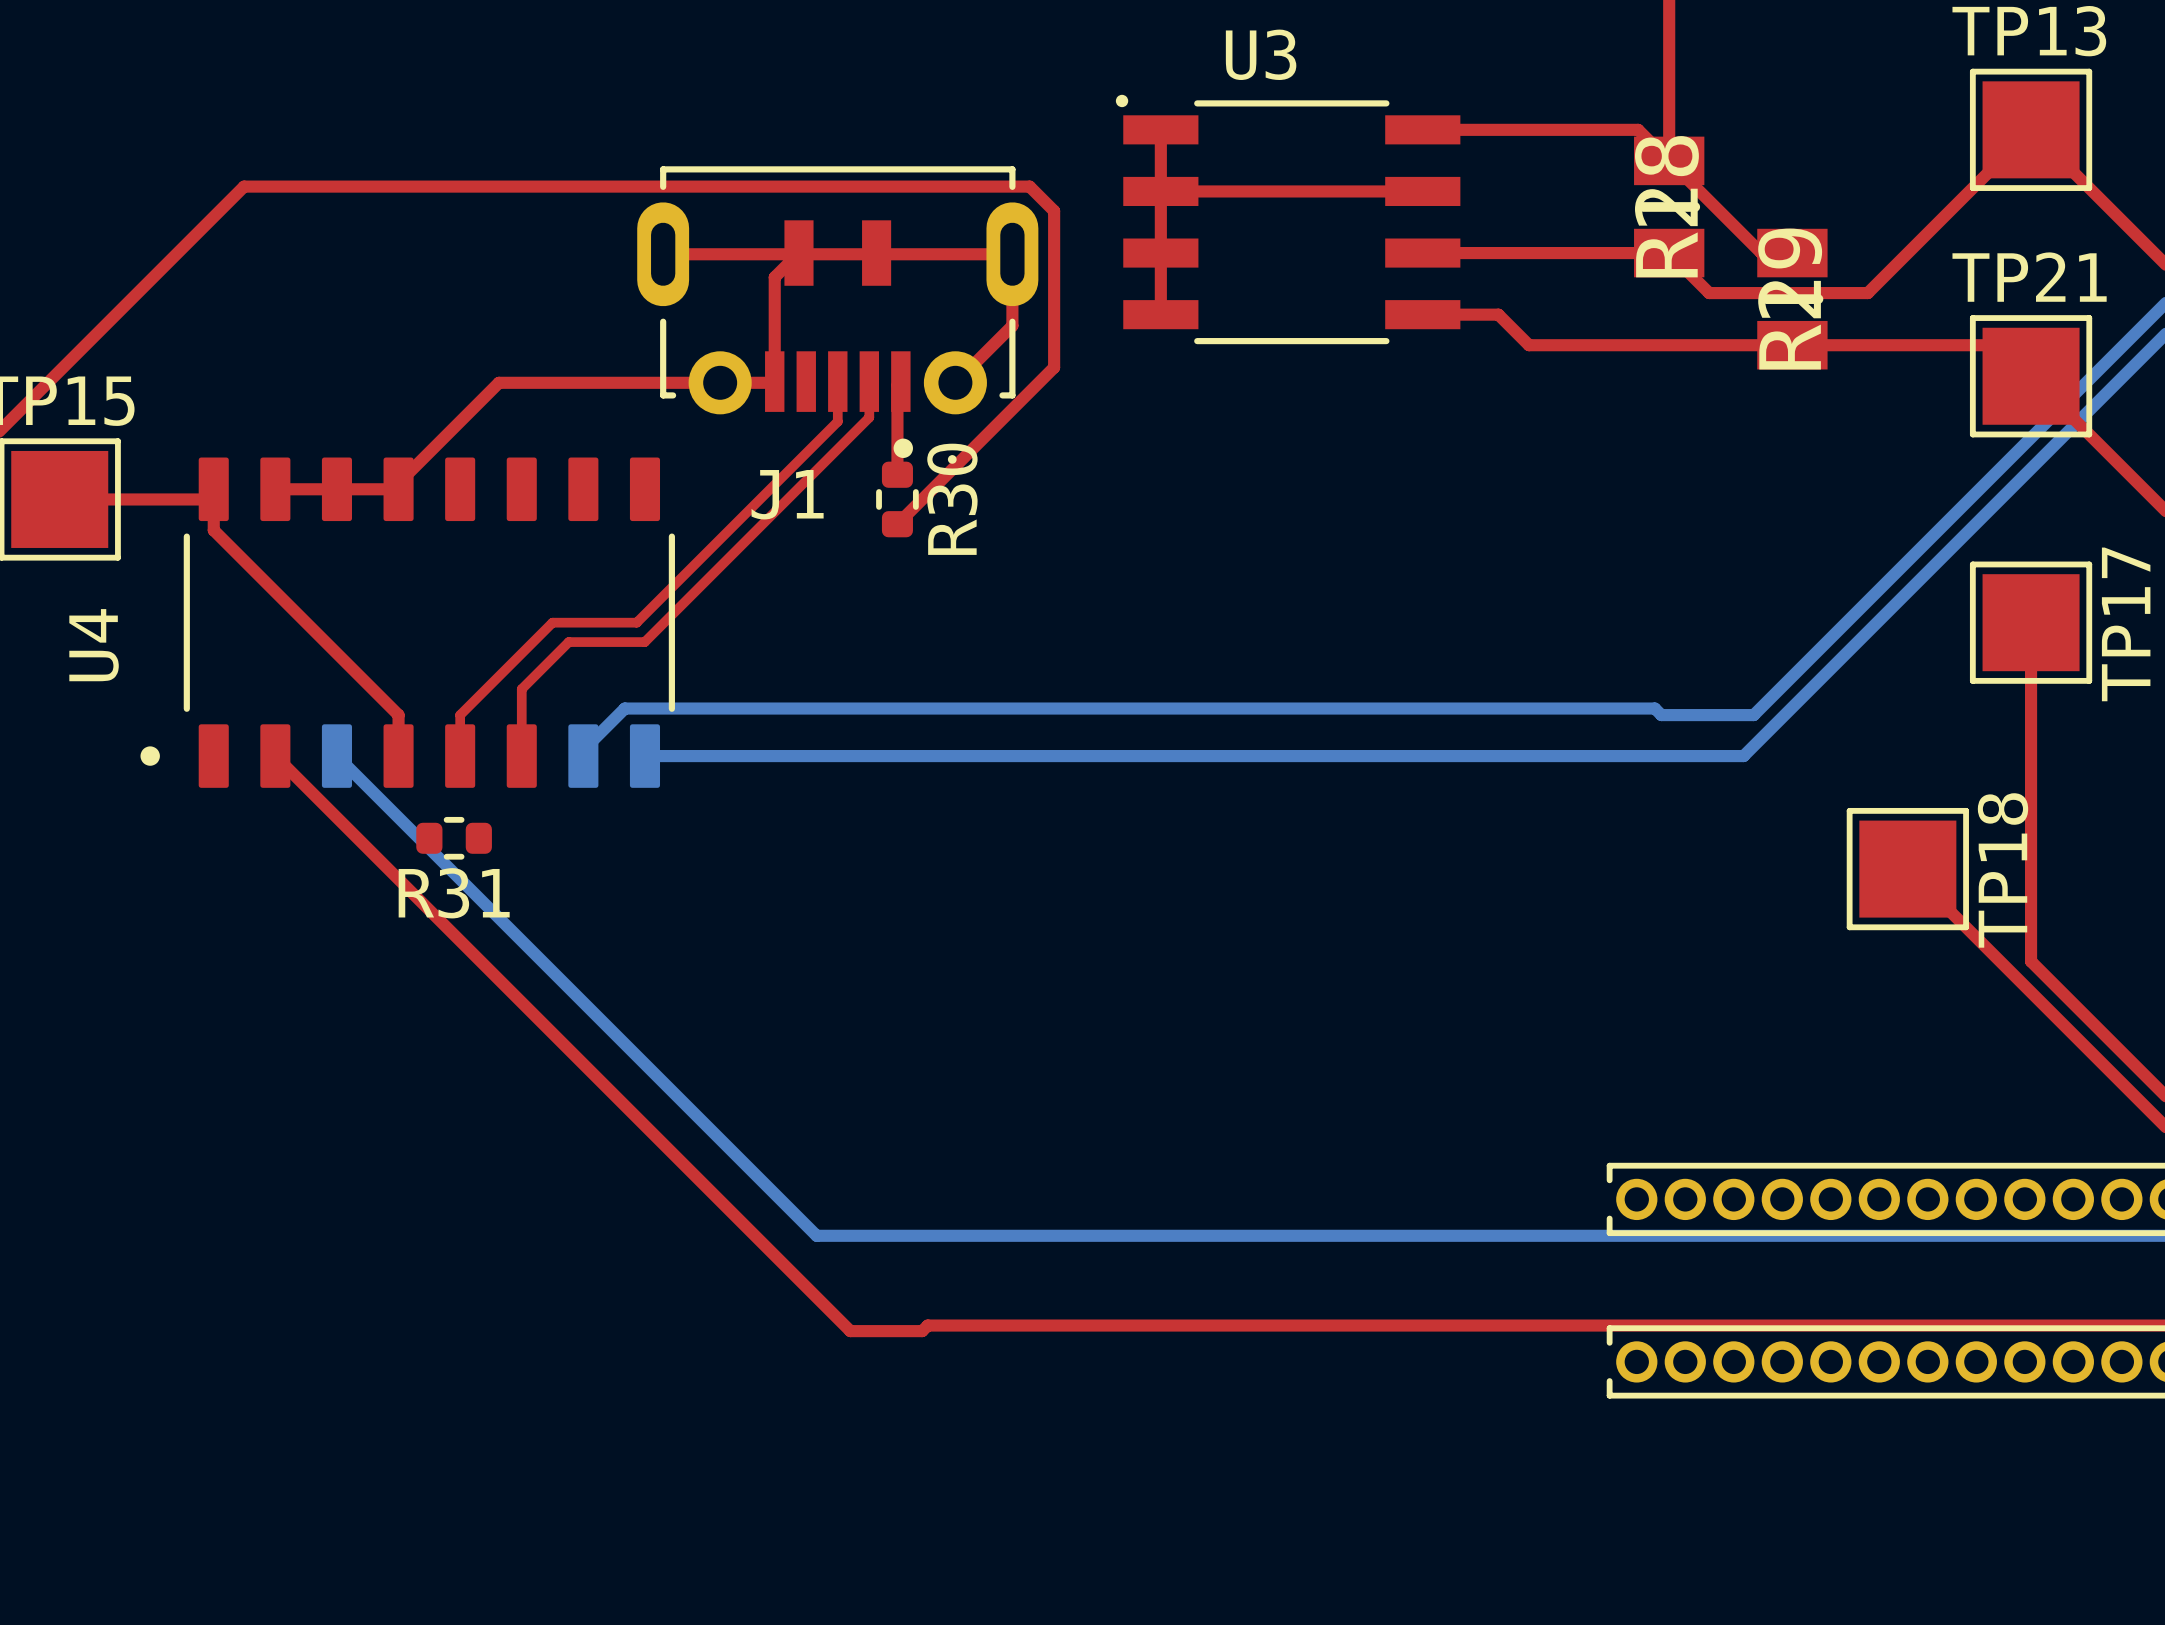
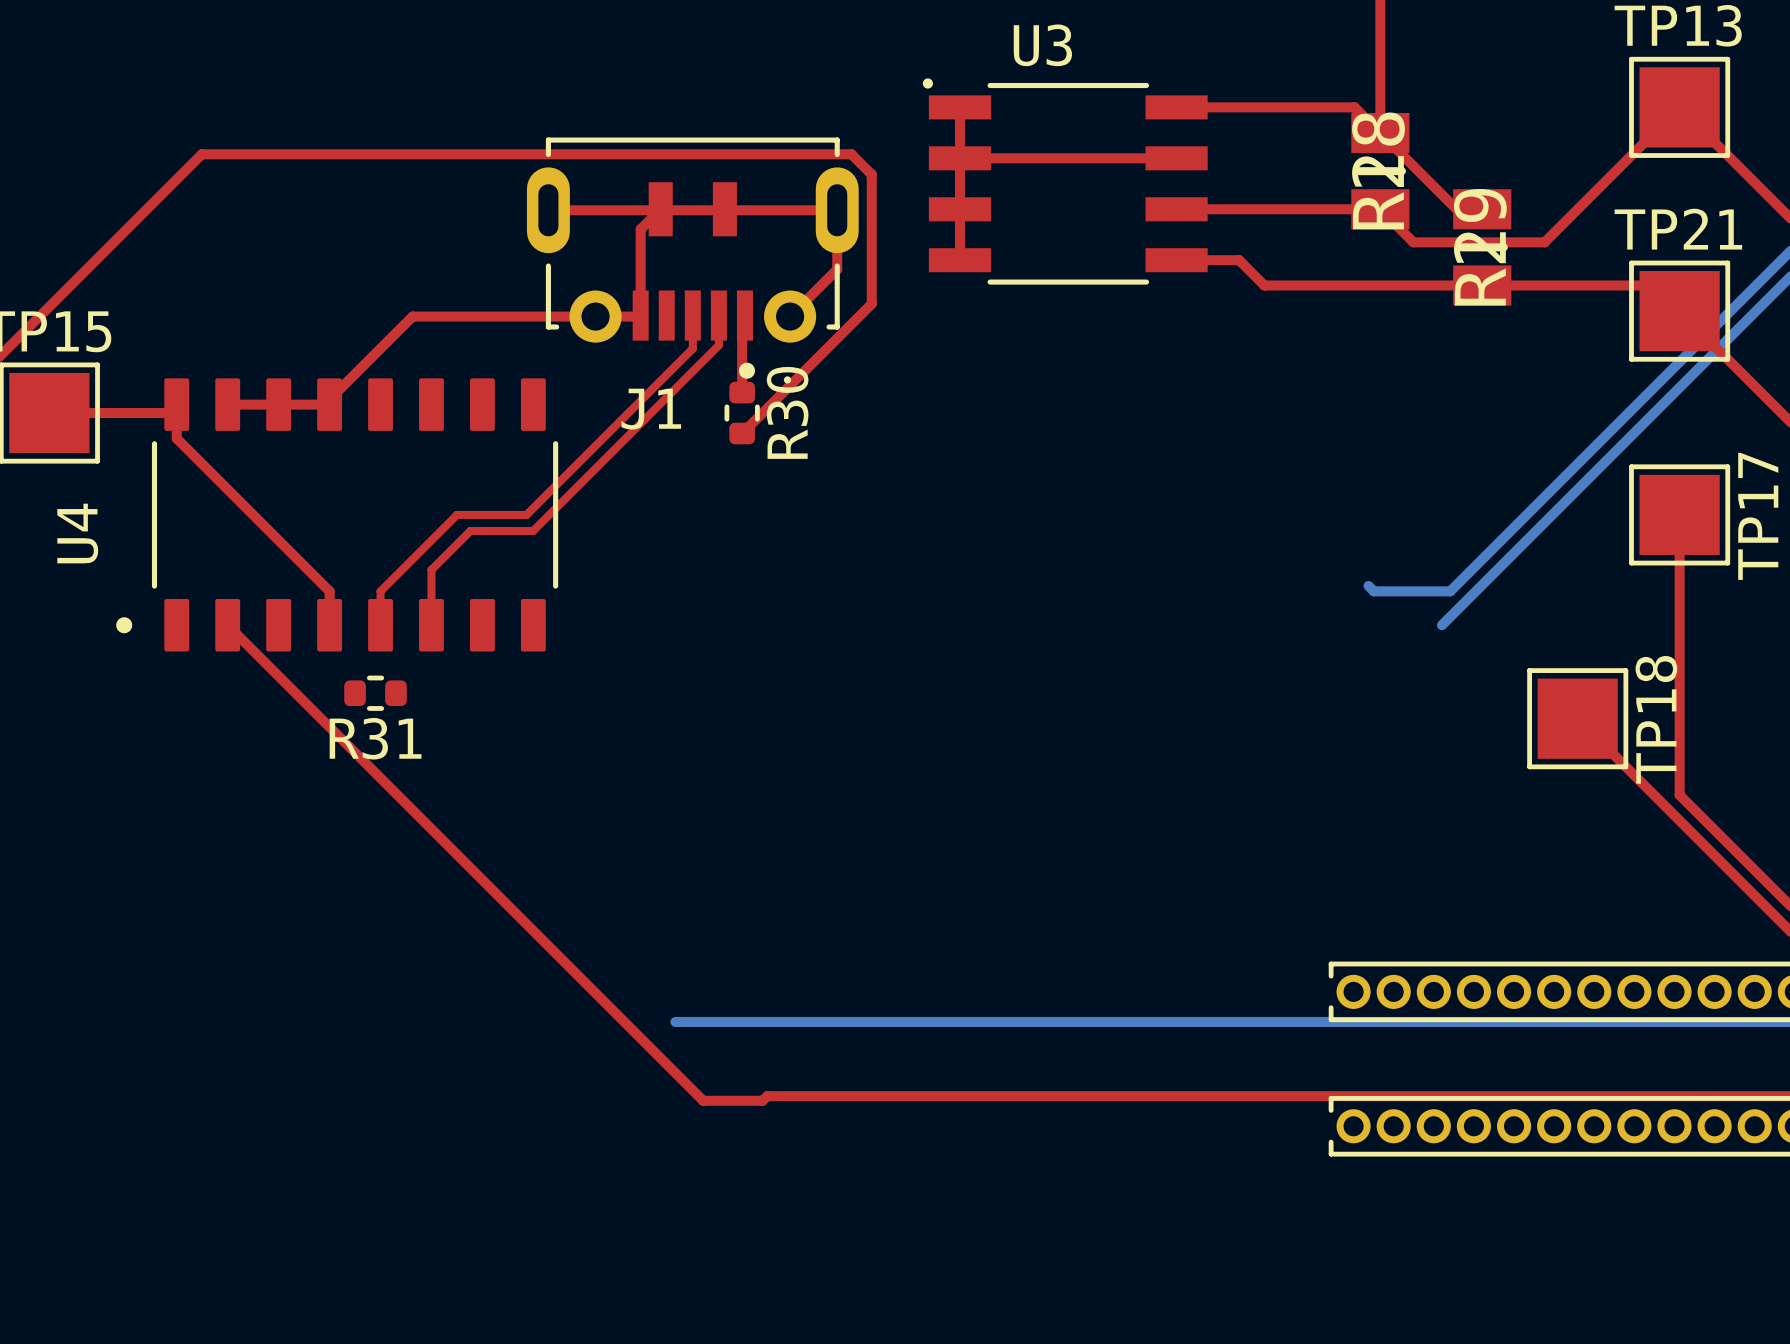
U4 footprint: [140, 457, 675, 788] -> [116, 378, 559, 652]
bottom track: (1654, 708) (624, 708) (583, 749) (583, 756) -> none
bottom track: (336, 756) (816, 1235) -> none
bottom track: (644, 756) (1743, 756) -> none

